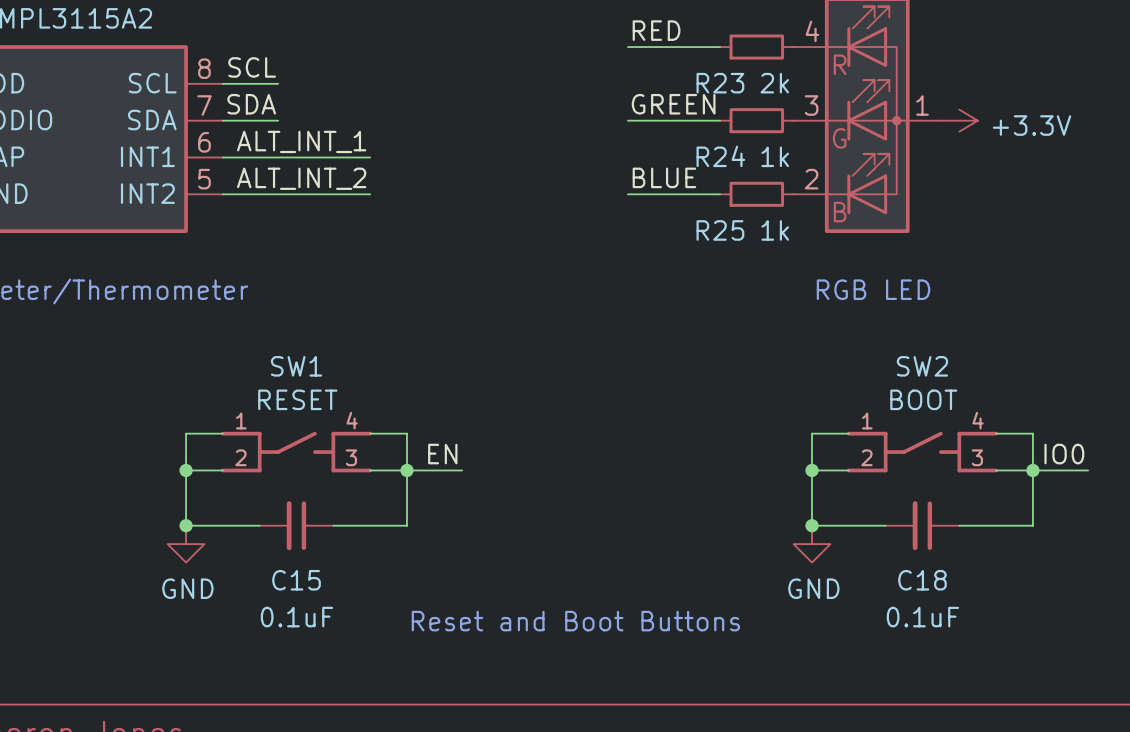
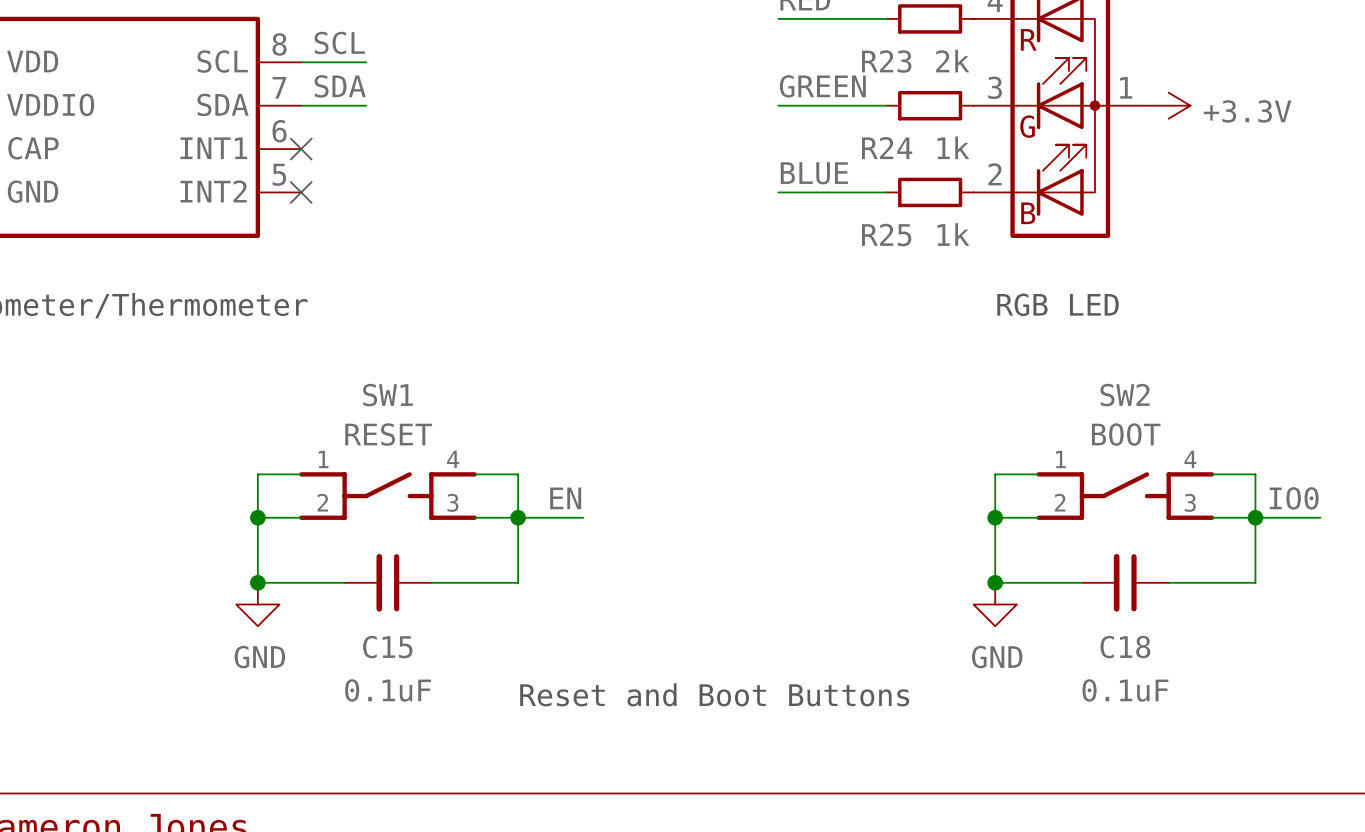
label: ALT_INT_1 (301, 141) -> none
wire: (222, 157) (370, 157) -> none
no-connect mark: none -> (301, 149)
label: ALT_INT_2 (301, 178) -> none
wire: (222, 194) (370, 194) -> none
no-connect mark: none -> (301, 192)

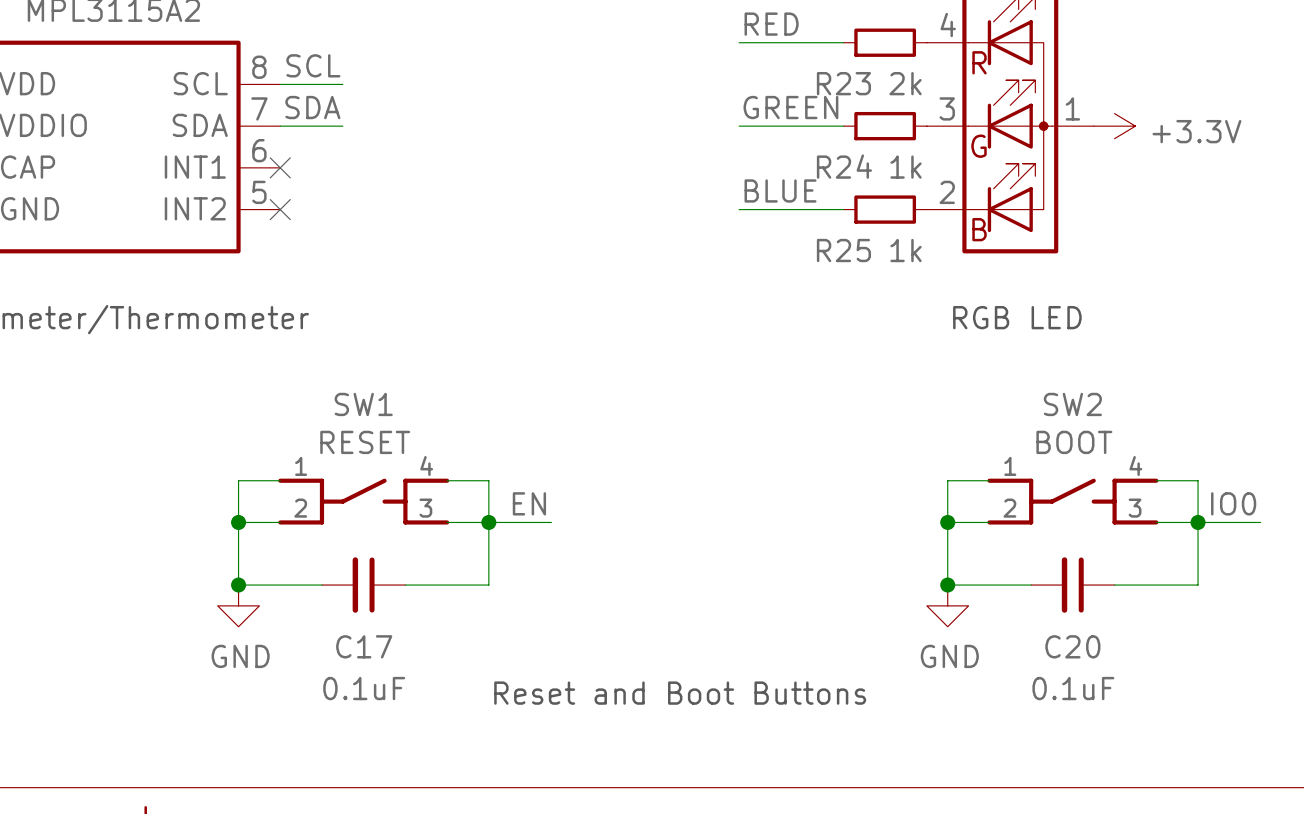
C15 name: C15 (387, 647) -> C17 (364, 646)
C18 name: C18 (1125, 647) -> C20 (1072, 646)

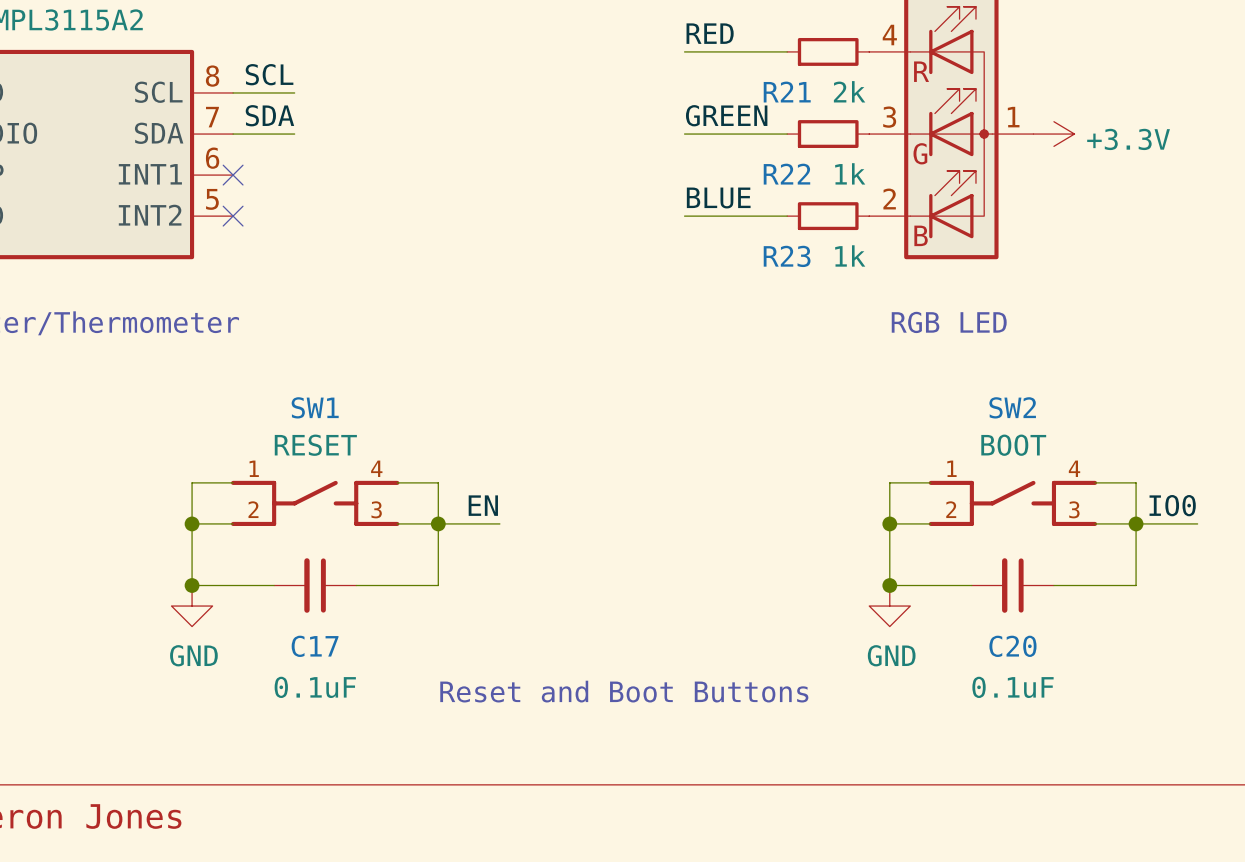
R23 name: R23 (843, 83) -> R21 (787, 92)
R24 name: R24 (844, 166) -> R22 (786, 174)
R25 name: R25 (843, 250) -> R23 (787, 256)

